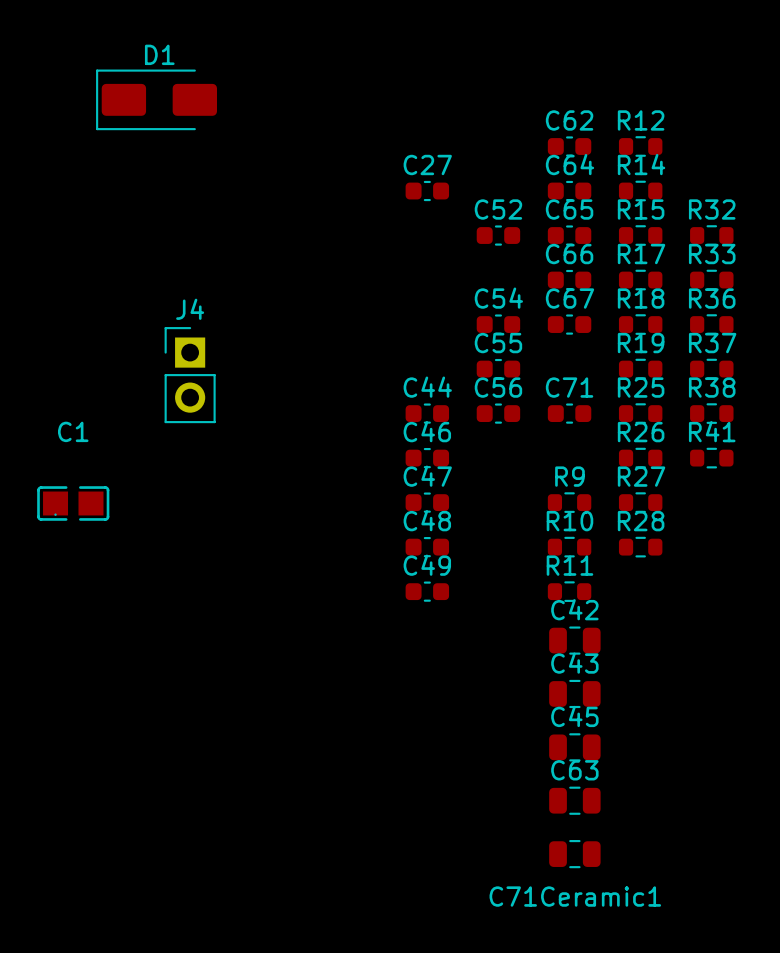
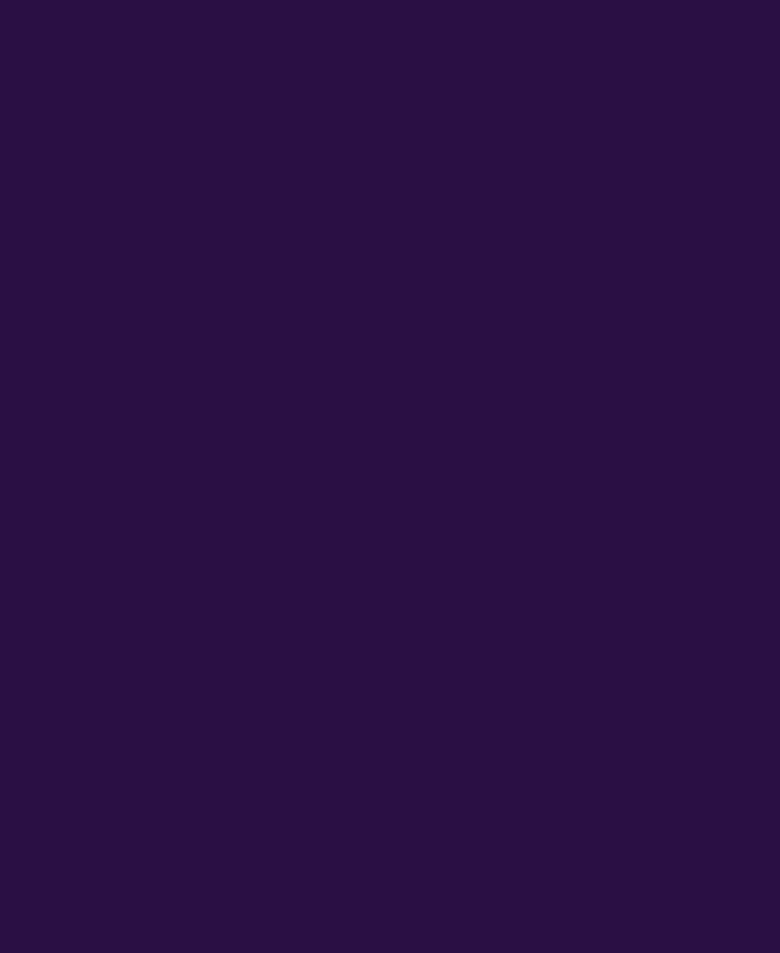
D1: (156, 99) -> none
C62: (569, 146) -> none
R12: (640, 146) -> none
C27: (427, 191) -> none
C64: (569, 191) -> none
R14: (640, 191) -> none
C52: (498, 235) -> none
C65: (569, 235) -> none
R15: (640, 235) -> none
R32: (711, 235) -> none
C66: (569, 280) -> none
R17: (640, 280) -> none
R33: (711, 280) -> none
C54: (498, 324) -> none
C67: (569, 324) -> none
R18: (640, 324) -> none
R36: (711, 324) -> none
C55: (498, 369) -> none
R19: (640, 369) -> none
R37: (711, 369) -> none
J4: (190, 375) -> none
C44: (427, 413) -> none
C56: (498, 413) -> none
C71: (569, 413) -> none
R25: (640, 413) -> none
R38: (711, 413) -> none
C46: (427, 458) -> none
R26: (640, 458) -> none
R41: (711, 458) -> none
C47: (427, 502) -> none
R9: (569, 502) -> none
R27: (640, 502) -> none
C1: (73, 503) -> none
C48: (427, 547) -> none
R10: (569, 547) -> none
R28: (640, 547) -> none
C49: (427, 591) -> none
R11: (569, 591) -> none
C42: (574, 640) -> none
C43: (574, 693) -> none
C45: (574, 747) -> none
C63: (574, 800) -> none
C71Ceramic1: (574, 854) -> none

